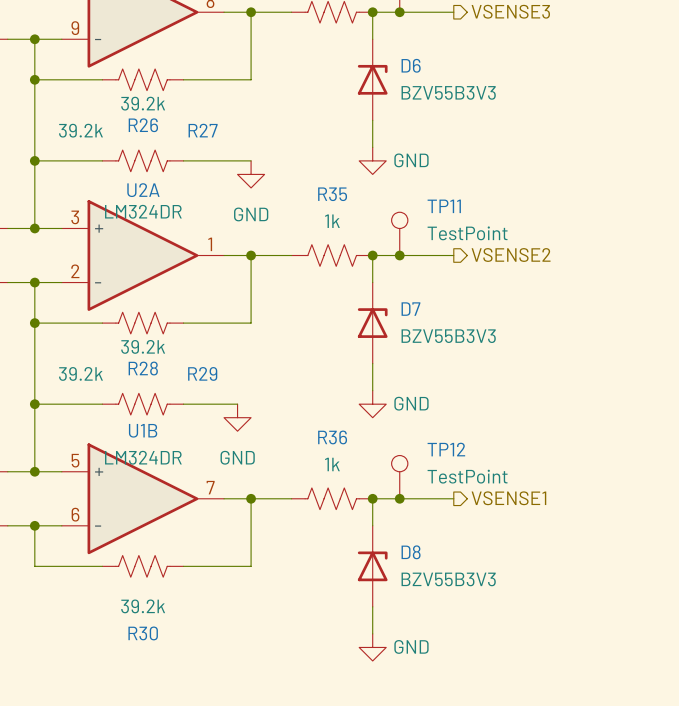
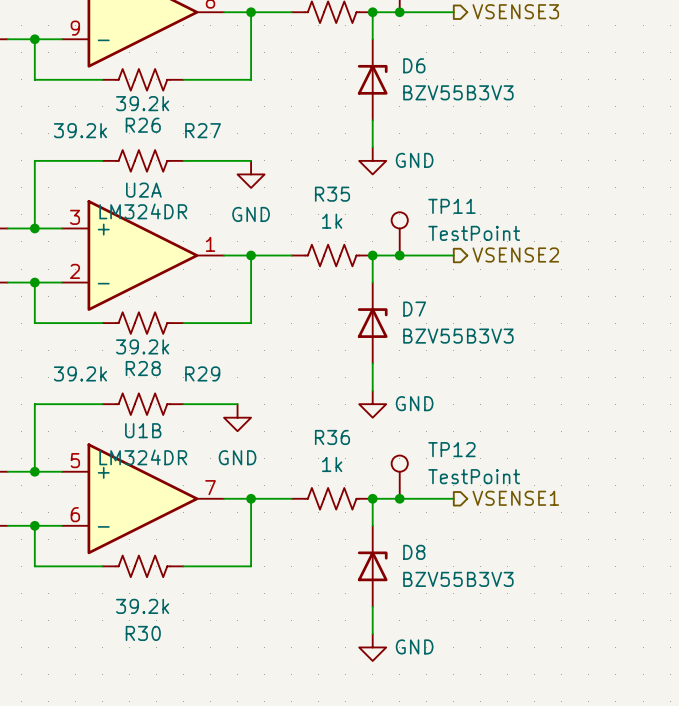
wire: (34, 79) (34, 160) -> none
junction: (34, 79) -> none
junction: (34, 160) -> none
wire: (34, 323) (34, 404) -> none
junction: (34, 323) -> none
junction: (34, 404) -> none

